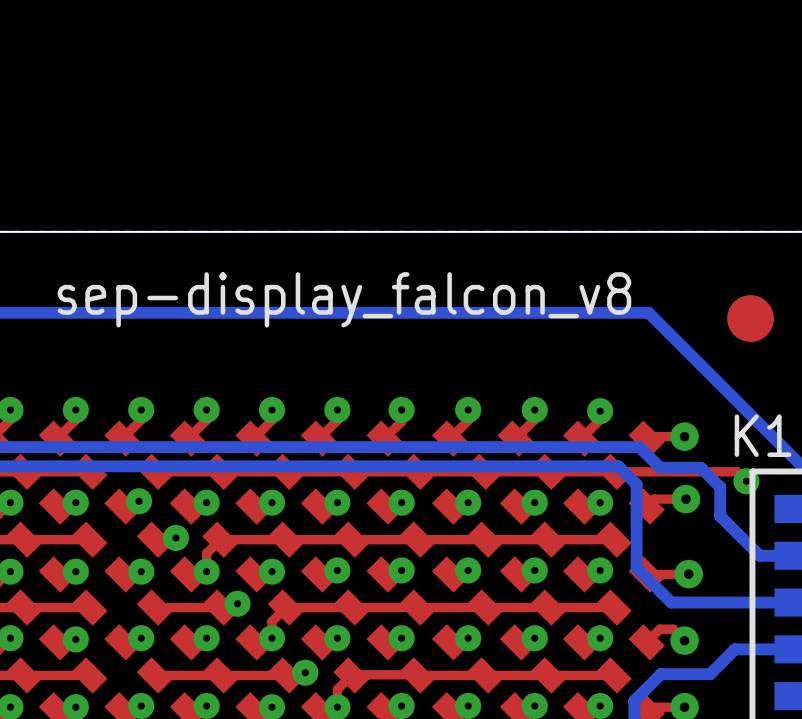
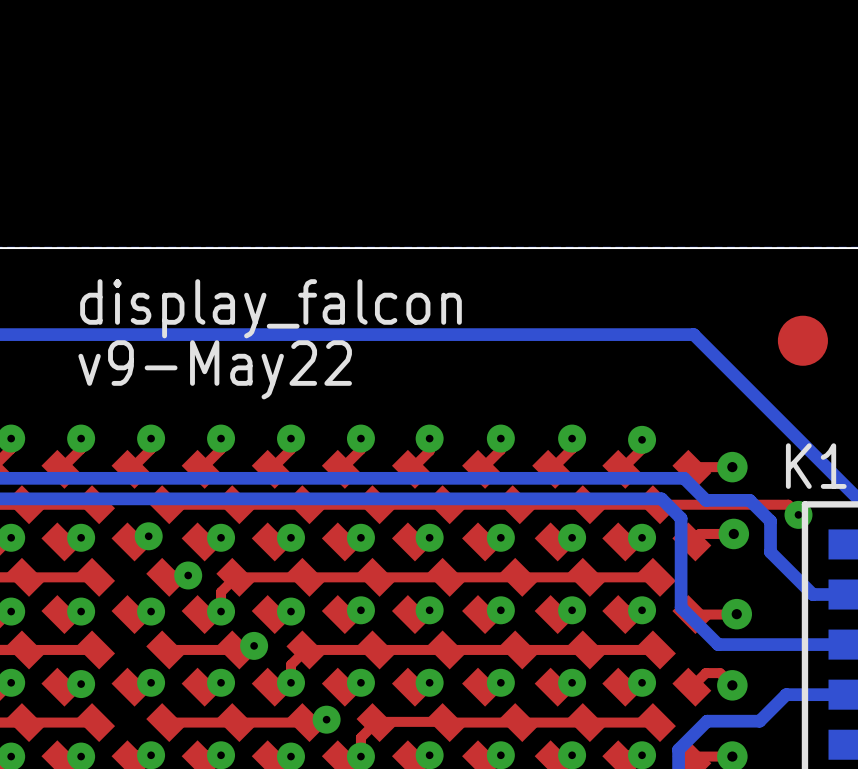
text: sep-display_falcon_v8 (344, 299) -> display_falcon (270, 308)
text: none -> v9-May22 (215, 369)

